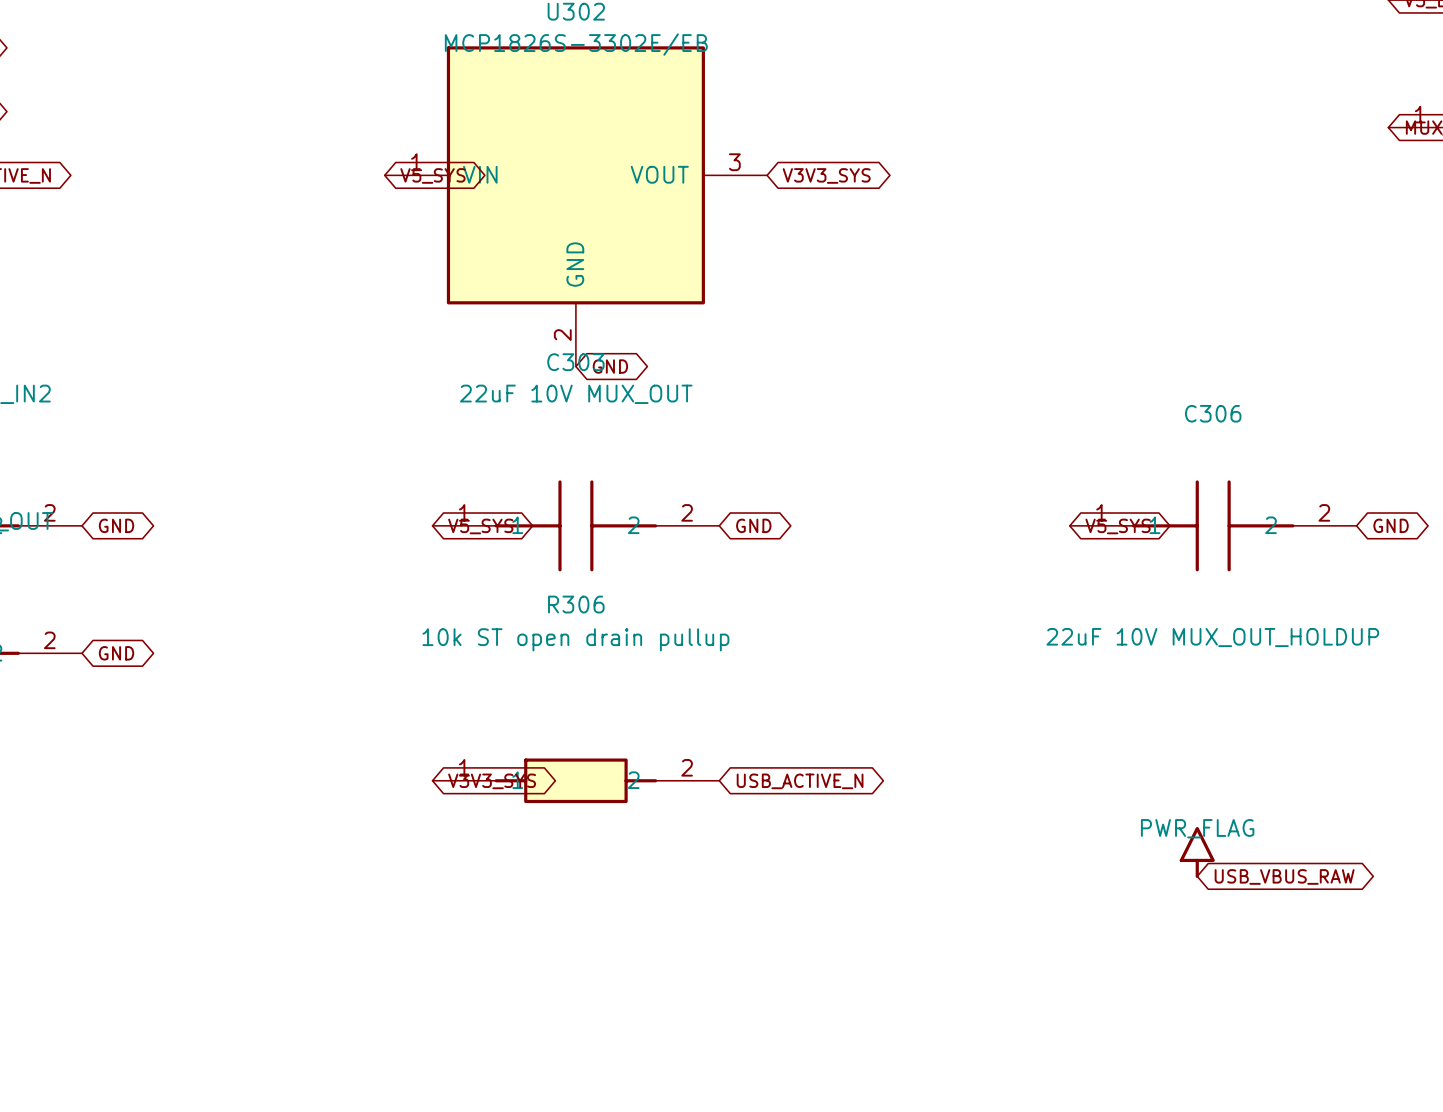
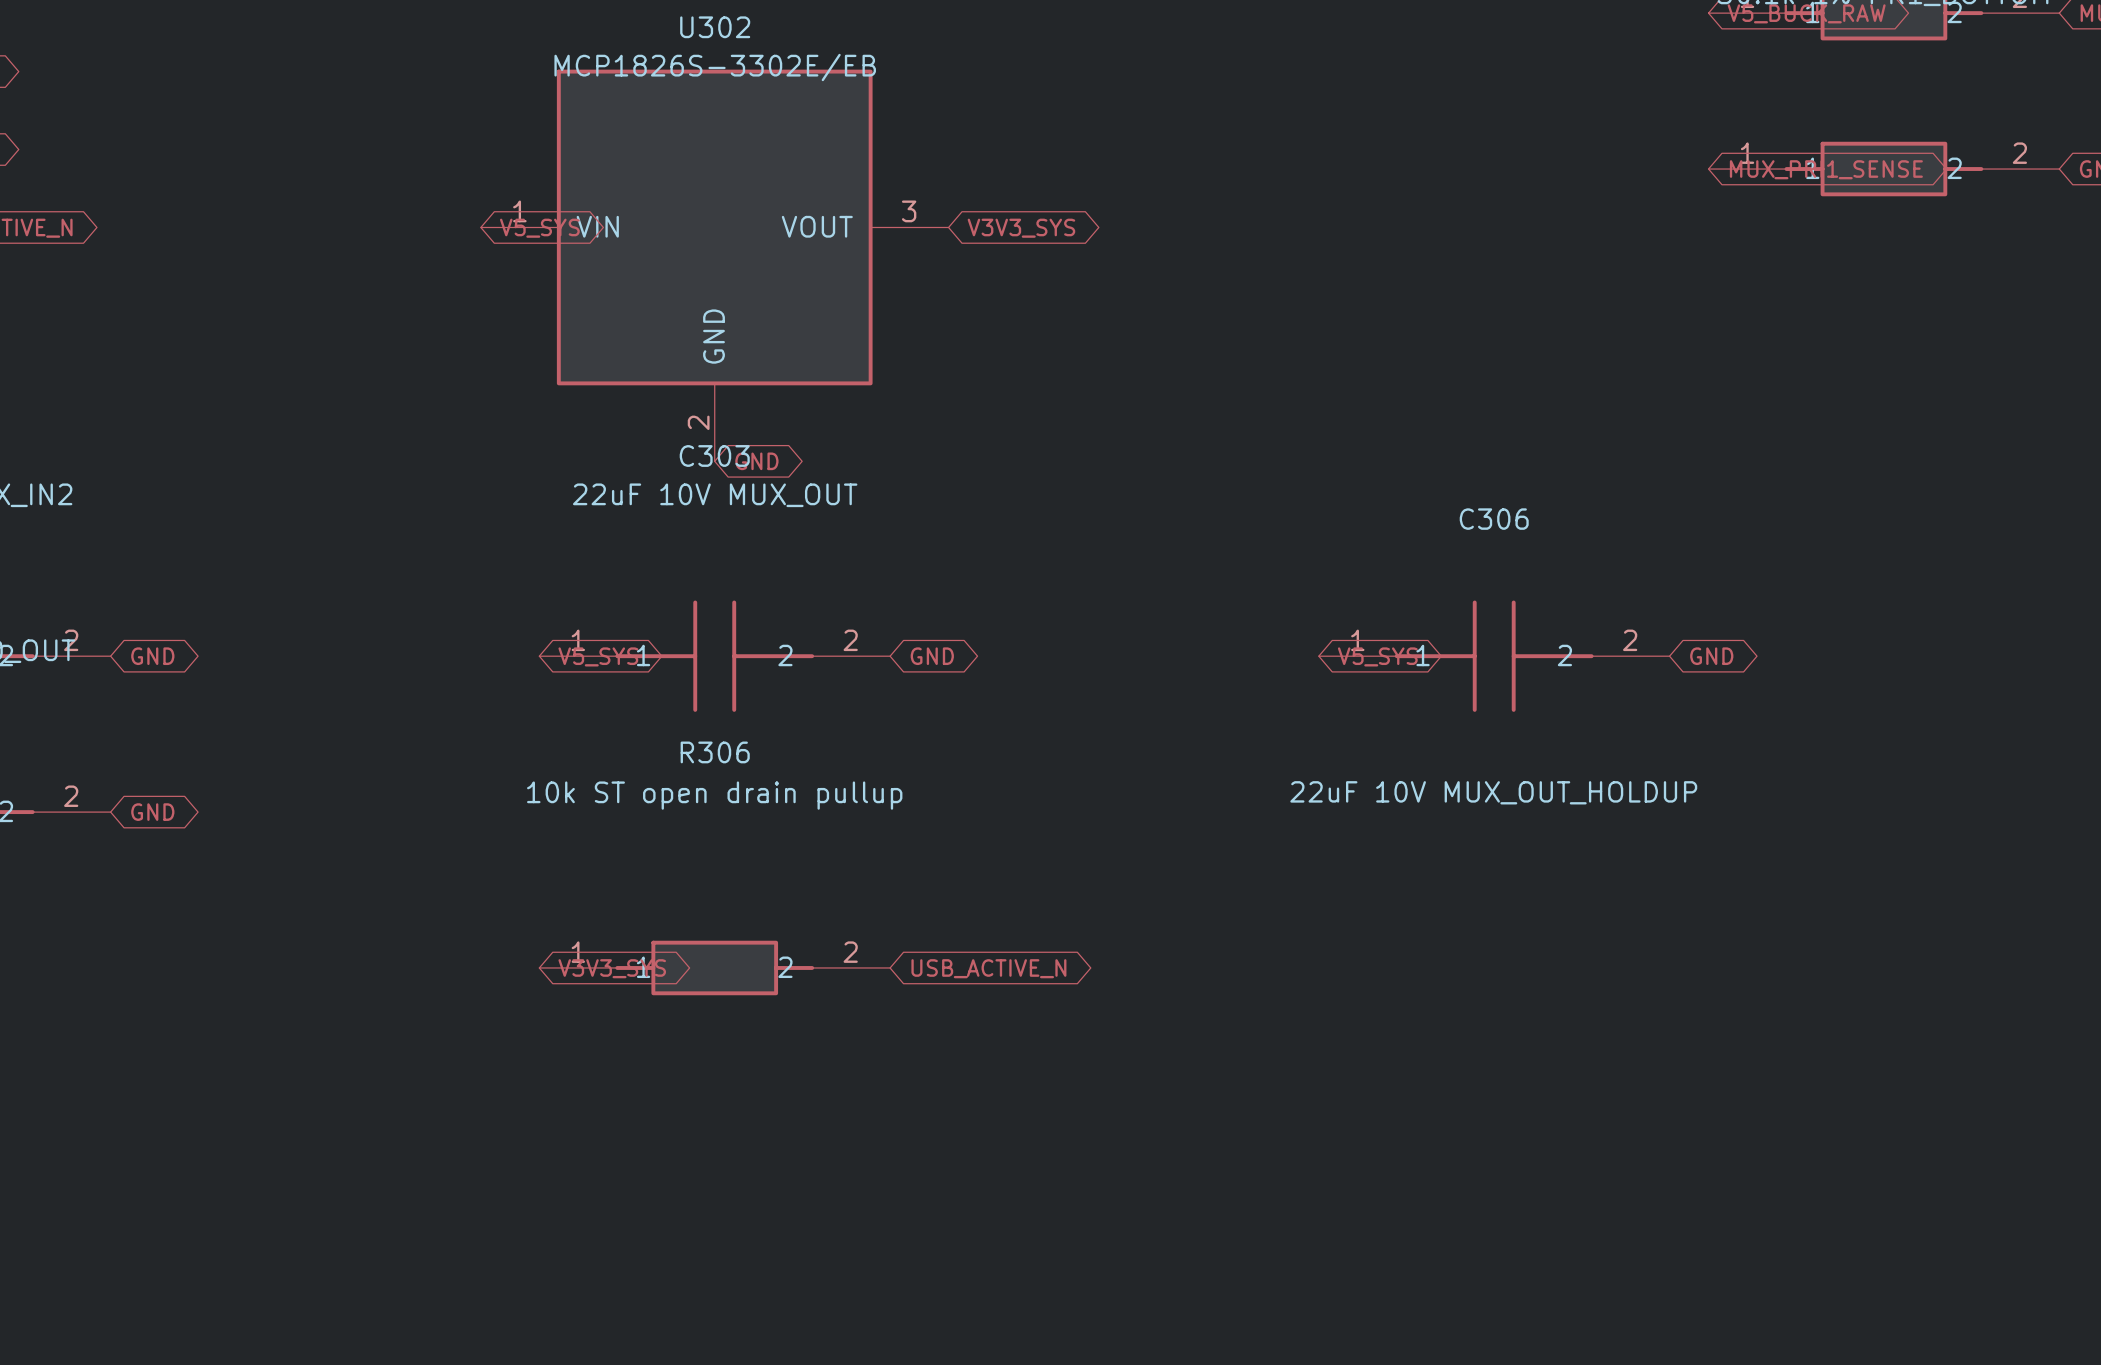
power symbol: PWR_FLAG (1197, 852) -> none
global label: USB_VBUS_RAW (1284, 876) -> none

